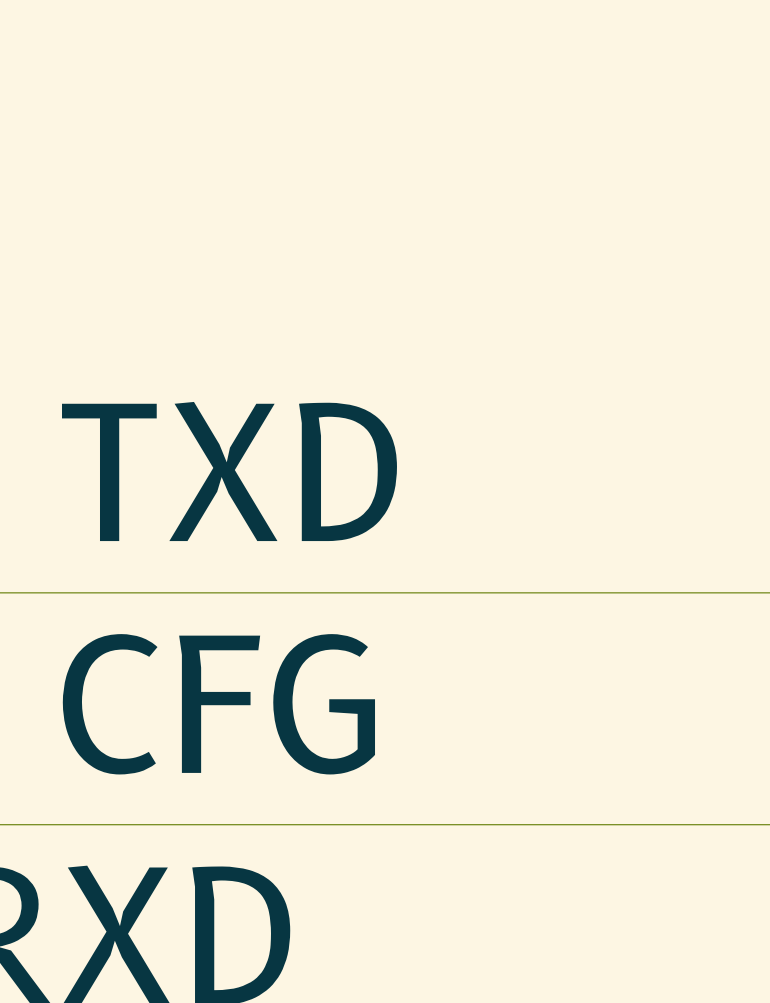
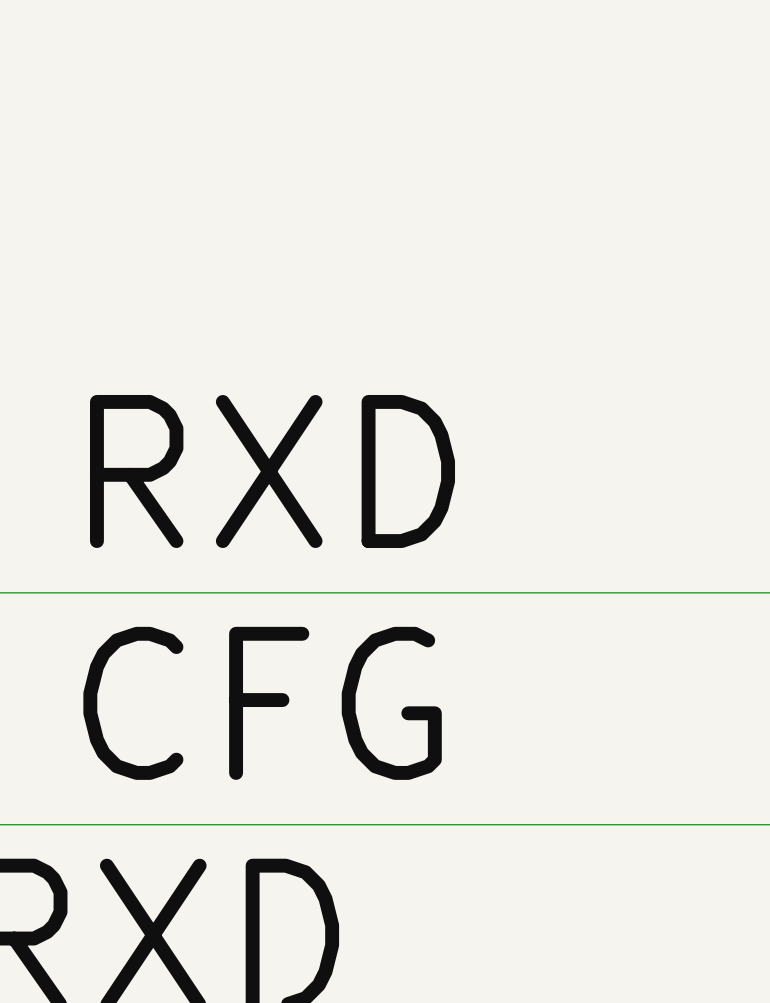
label: TXD (229, 471) -> RXD (272, 471)

